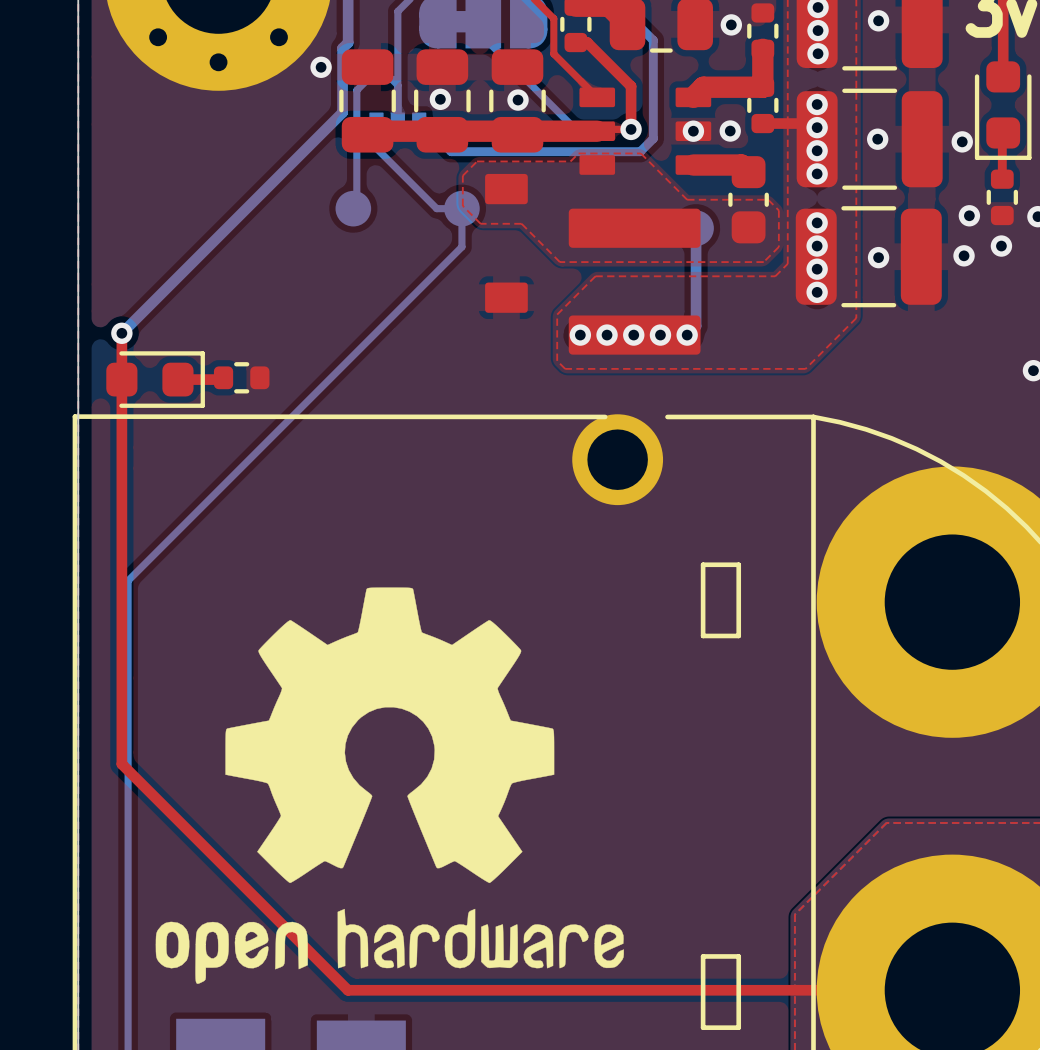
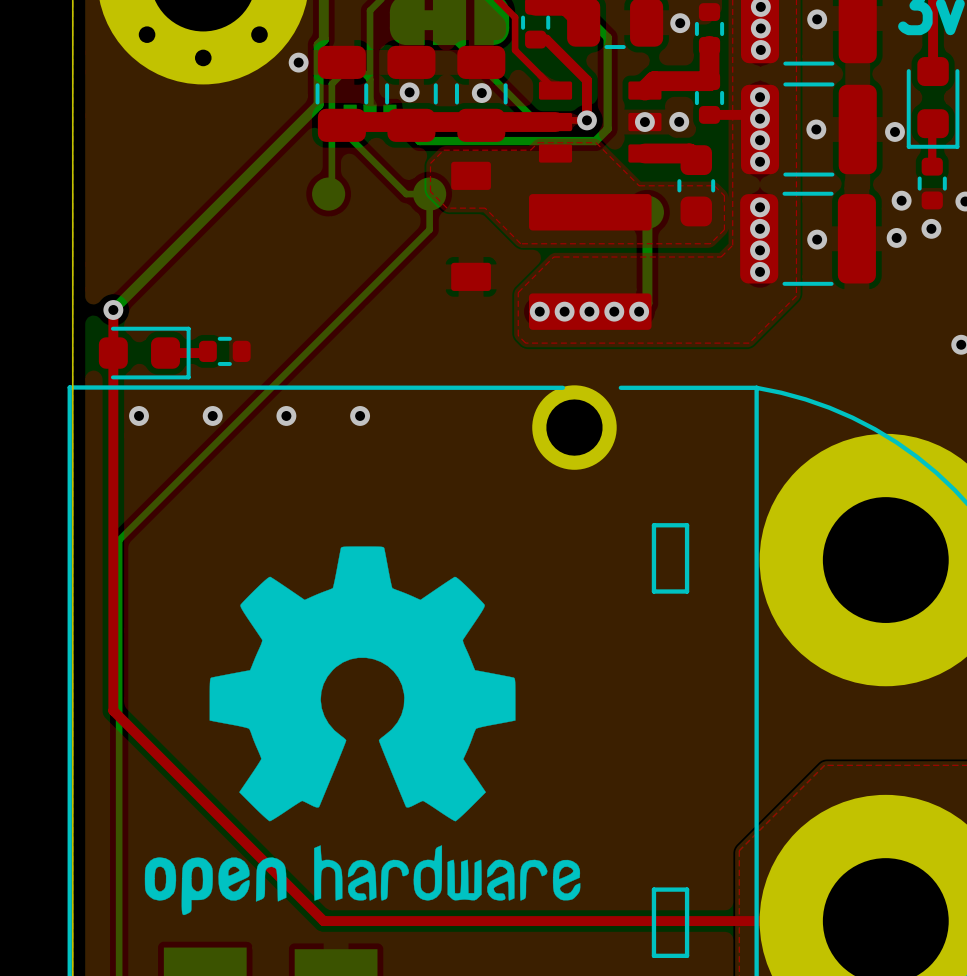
via: none -> (139, 415)
via: none -> (212, 415)
via: none -> (286, 415)
via: none -> (360, 415)

